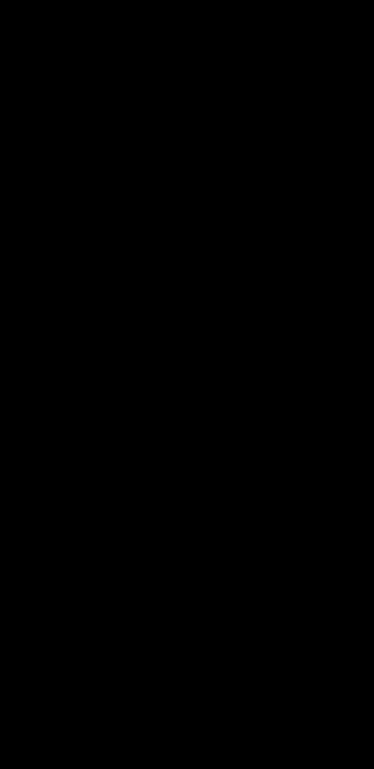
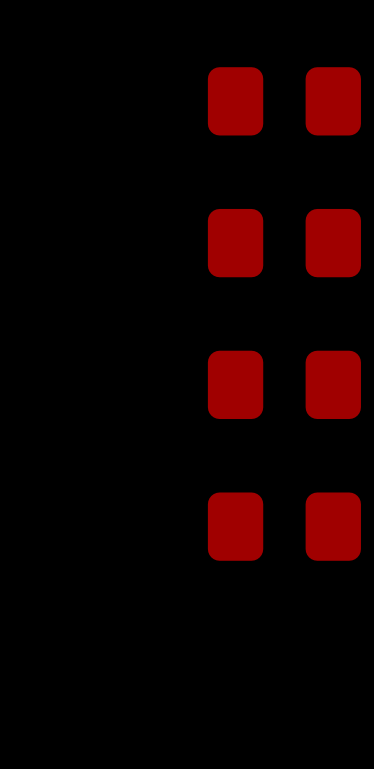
part: none -> (284, 101)
part: none -> (284, 243)
part: none -> (284, 384)
part: none -> (284, 526)

